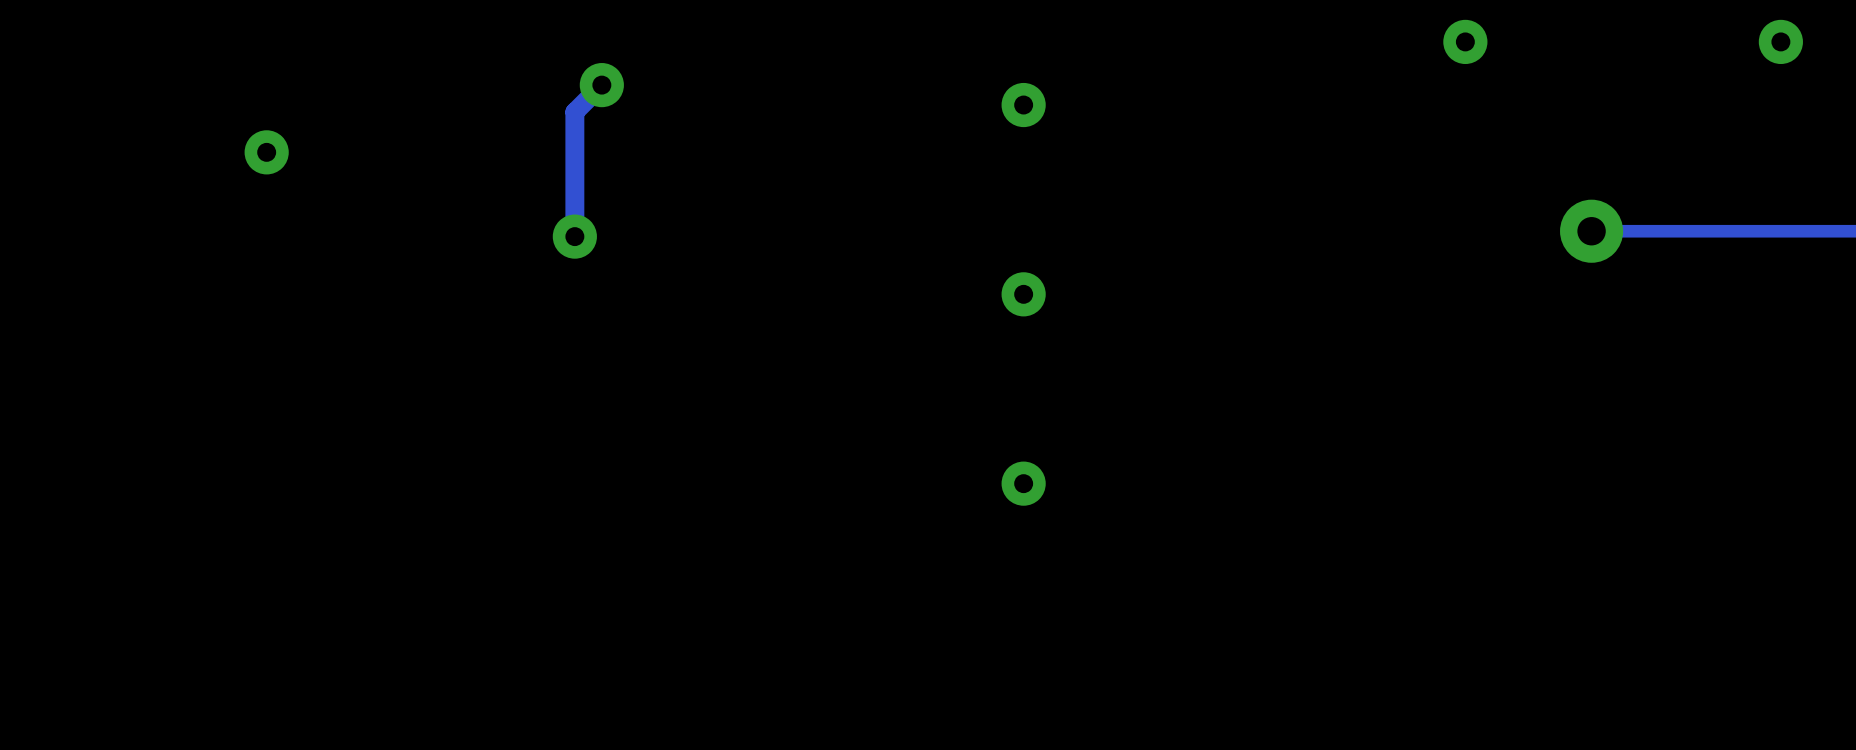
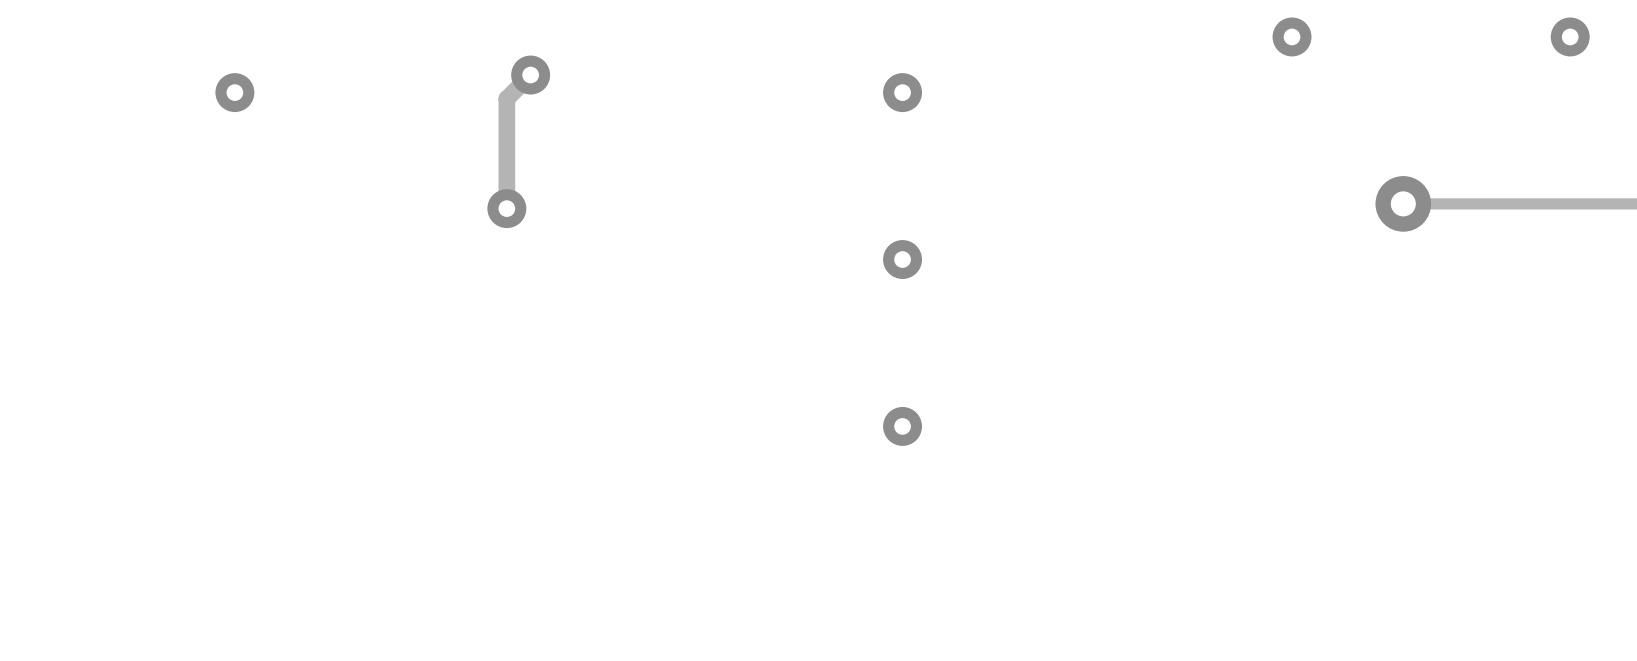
via position: (266, 152) -> (234, 92)

